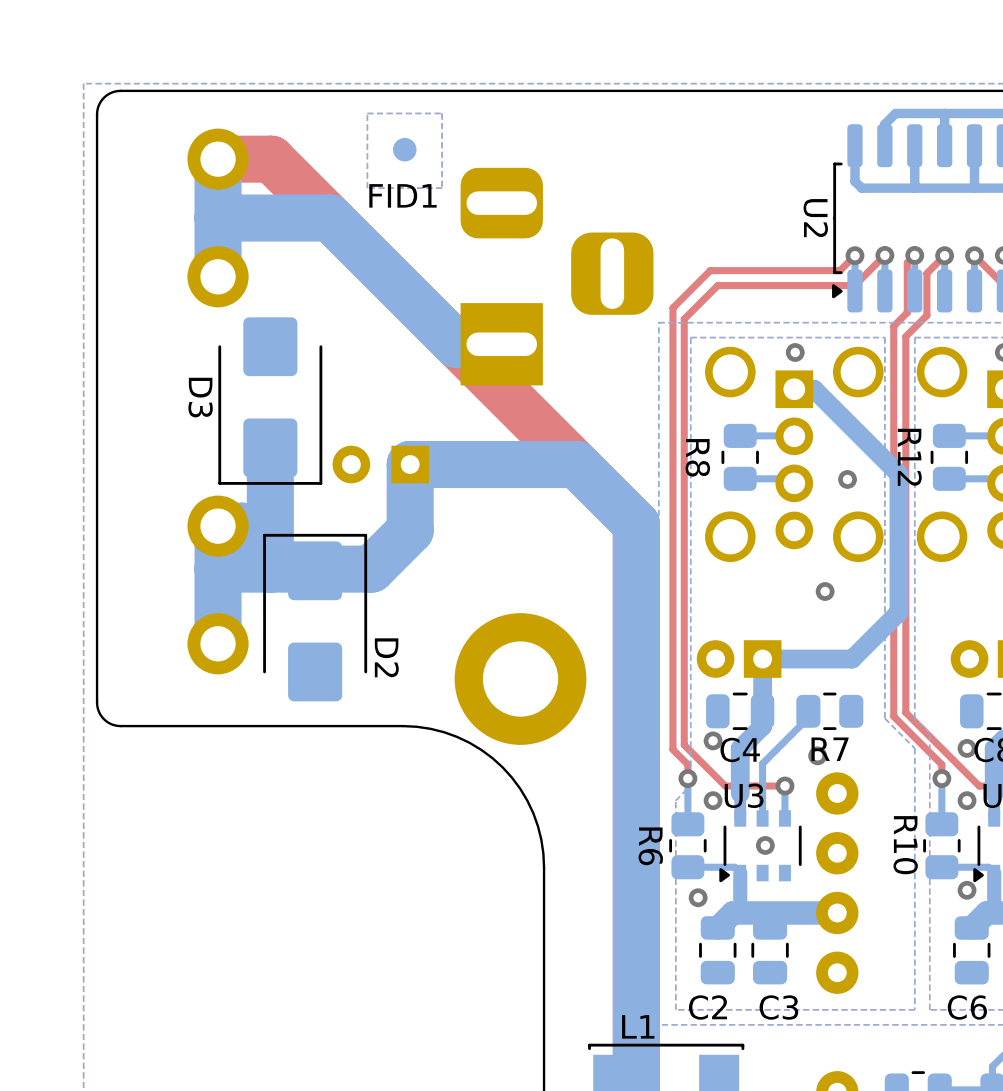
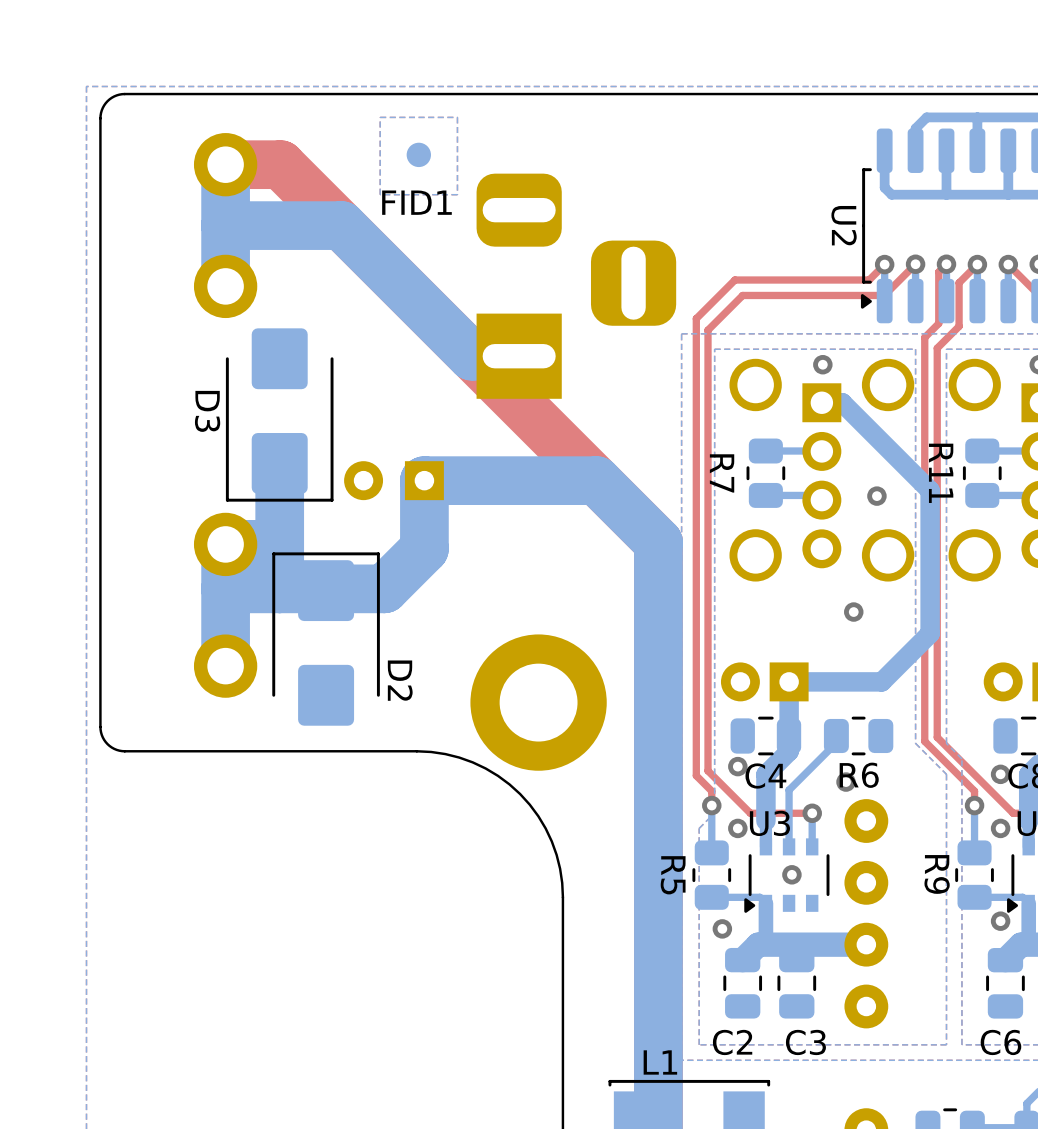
R8 name: R8 (697, 457) -> R7 (722, 473)
R12 name: R12 (909, 457) -> R11 (941, 473)
R7 name: R7 (830, 749) -> R6 (859, 775)
R10 name: R10 (905, 845) -> R9 (937, 874)
R6 name: R6 (650, 846) -> R5 (673, 875)

